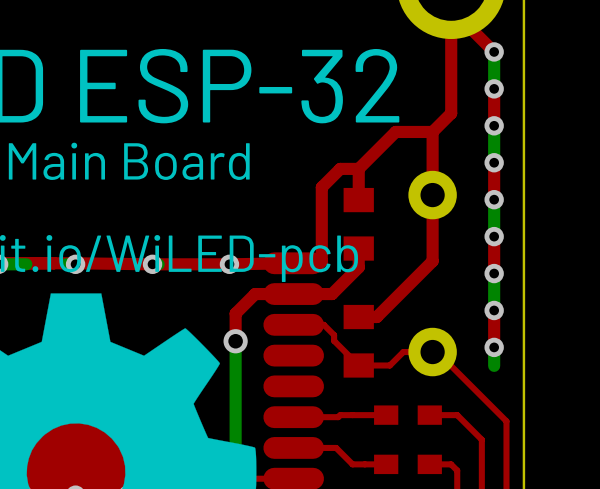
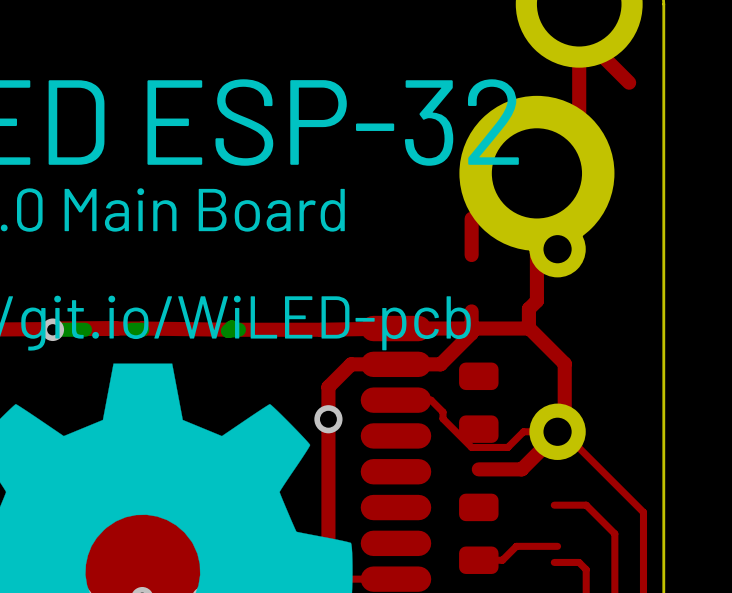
bottom track: (494, 51) (494, 88) -> none
via: (494, 51) -> none
top track: (494, 88) (494, 125) -> none
via: (494, 88) -> none
bottom track: (494, 125) (494, 162) -> none
via: (494, 125) -> none
top track: none -> (536, 173) (536, 300) (528, 308) (528, 327) (564, 363) (564, 426) (521, 469) (478, 469)
part: none -> (536, 173)
top track: (494, 162) (494, 199) -> none
via: (494, 162) -> none
bottom track: (494, 199) (494, 236) -> none
via: (494, 199) -> none
part: (358, 224) -> none
top track: (494, 236) (494, 273) -> none
via: (494, 236) -> none
top track: (319, 263) (321, 261) (321, 187) (340, 168) (358, 168) (395, 131) (432, 131) (432, 261) (376, 317) (358, 317) -> (426, 328) (529, 328)
via: (75, 264) -> none
via: (152, 264) -> none
via: (229, 264) -> none
bottom track: (494, 273) (494, 310) -> none
via: (494, 273) -> none
part footprint: [343, 304, 374, 378] -> [459, 362, 499, 443]
top track: (494, 310) (494, 347) -> none
via: (494, 310) -> none
top track: none -> (328, 419) (328, 548)
bottom track: (235, 341) (235, 452) -> none
bottom track: (494, 347) (494, 365) -> none
via: (494, 347) -> none
top track: (386, 415) (293, 417) -> none
part: (407, 415) -> none
part: none -> (478, 533)
top track: (293, 447) (336, 447) (352, 464) (386, 464) -> none
top track: none -> (557, 546) (516, 546) (502, 560) (471, 560)
part: (407, 464) -> none

